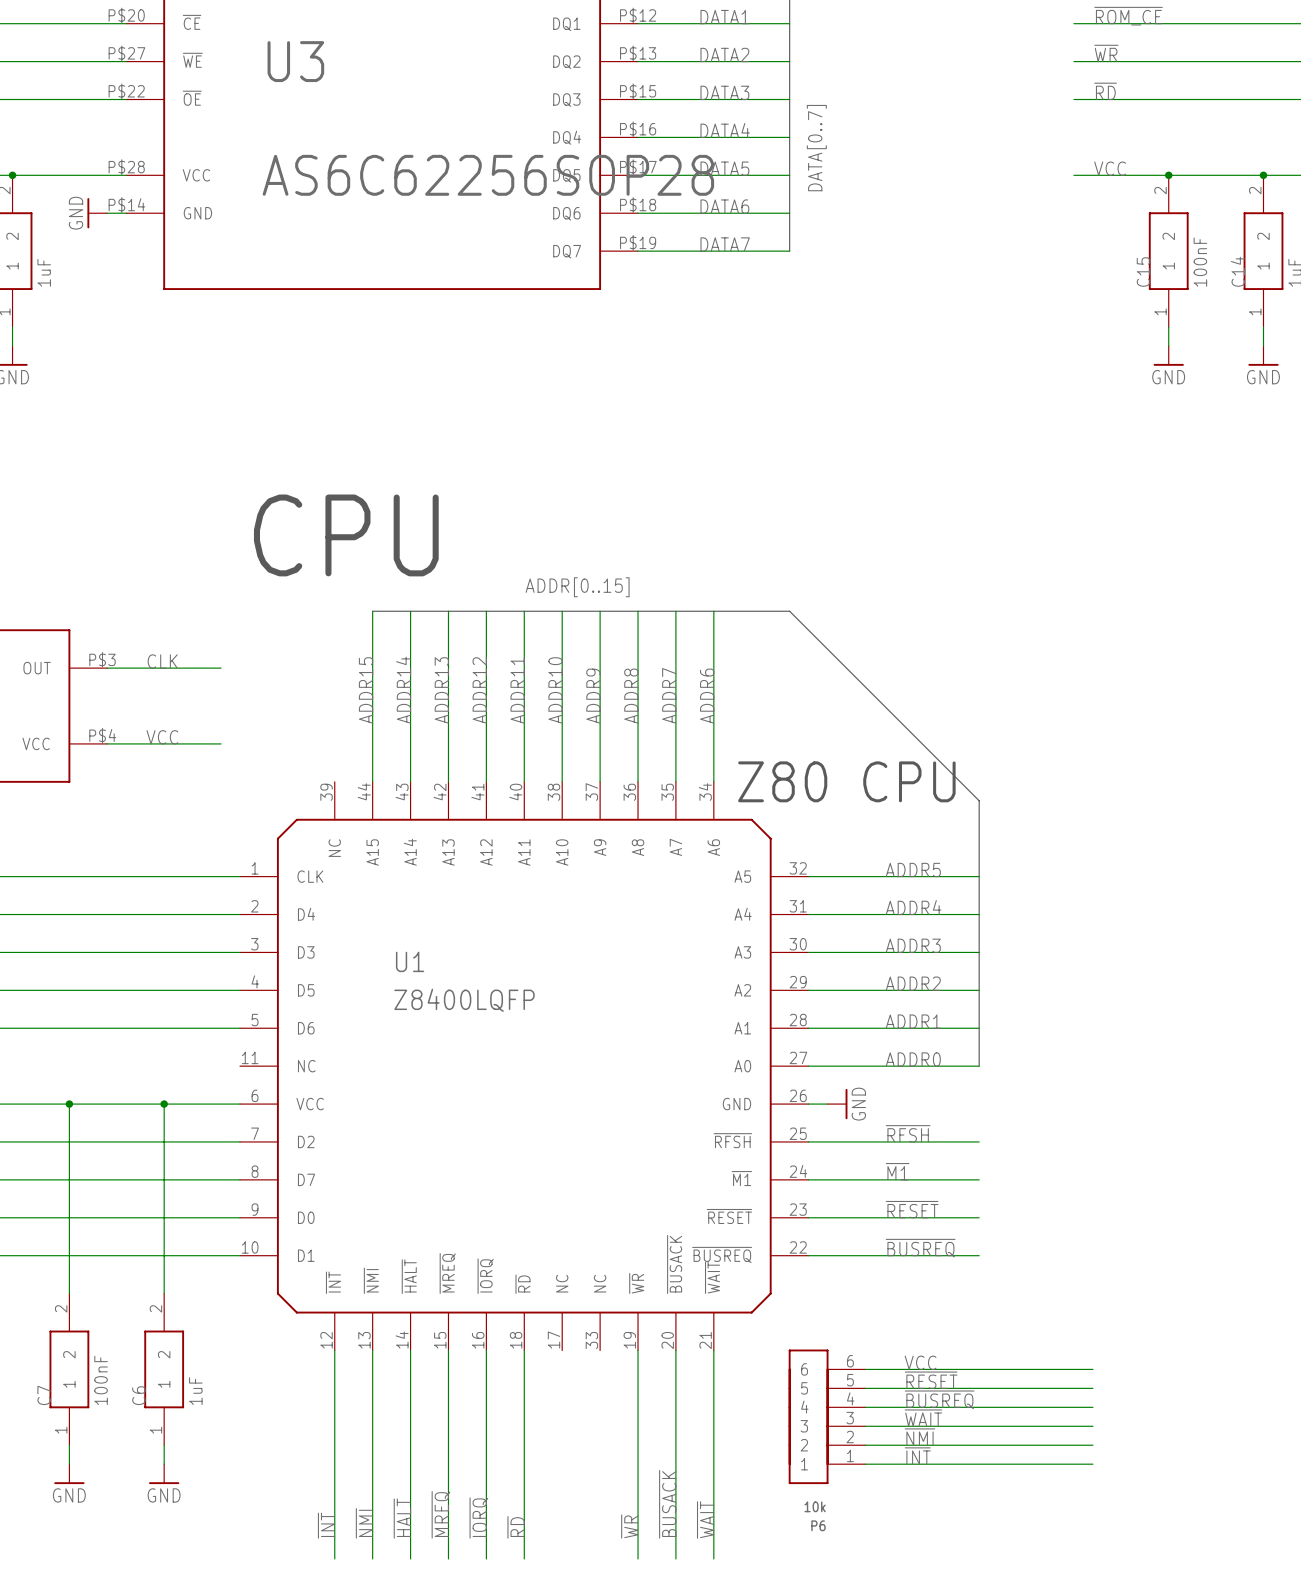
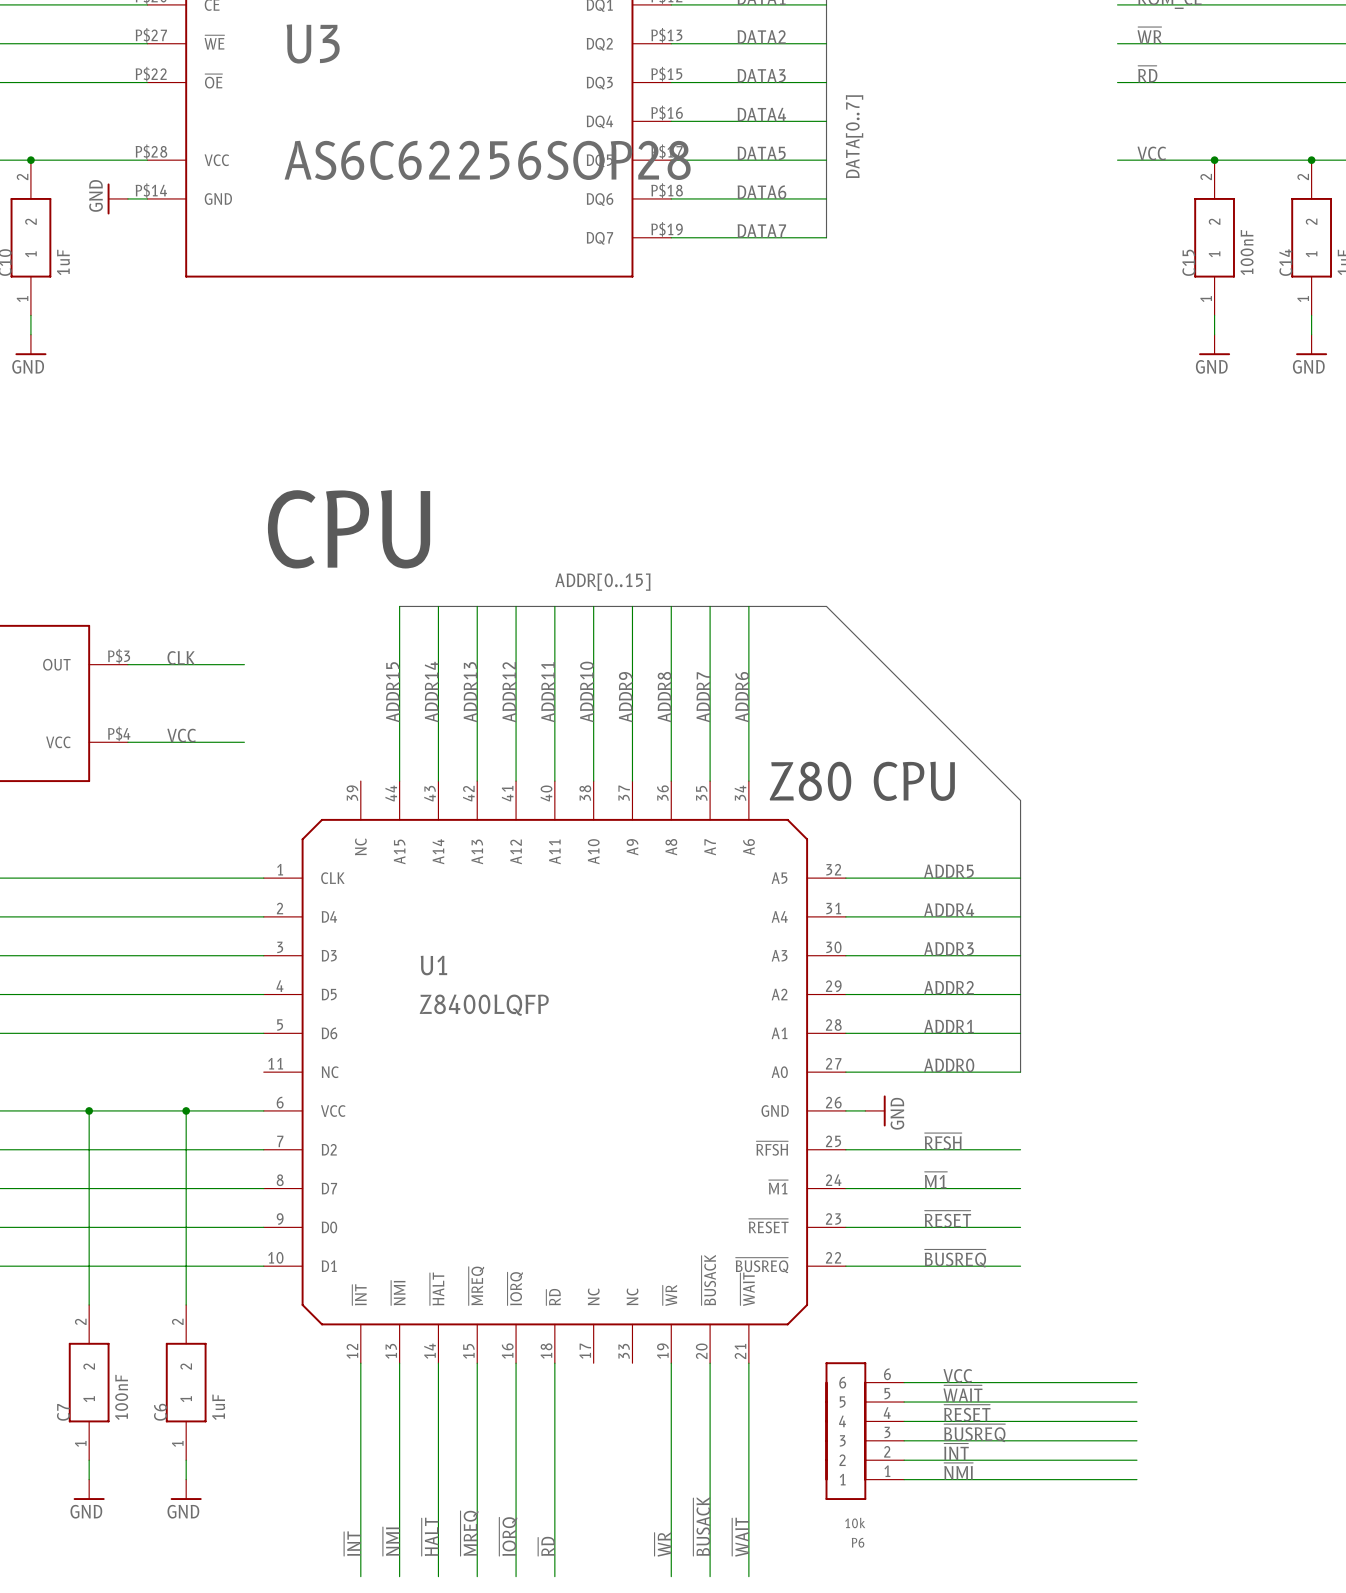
label: ~{RESET} (931, 1380) -> ~{WAIT} (962, 1393)
label: ~{BUSREQ} (939, 1399) -> ~{RESET} (967, 1413)
label: ~{WAIT} (923, 1418) -> ~{BUSREQ} (974, 1433)
label: ~{NMI} (919, 1437) -> ~{INT} (956, 1451)
label: ~{INT} (917, 1456) -> ~{NMI} (958, 1471)

